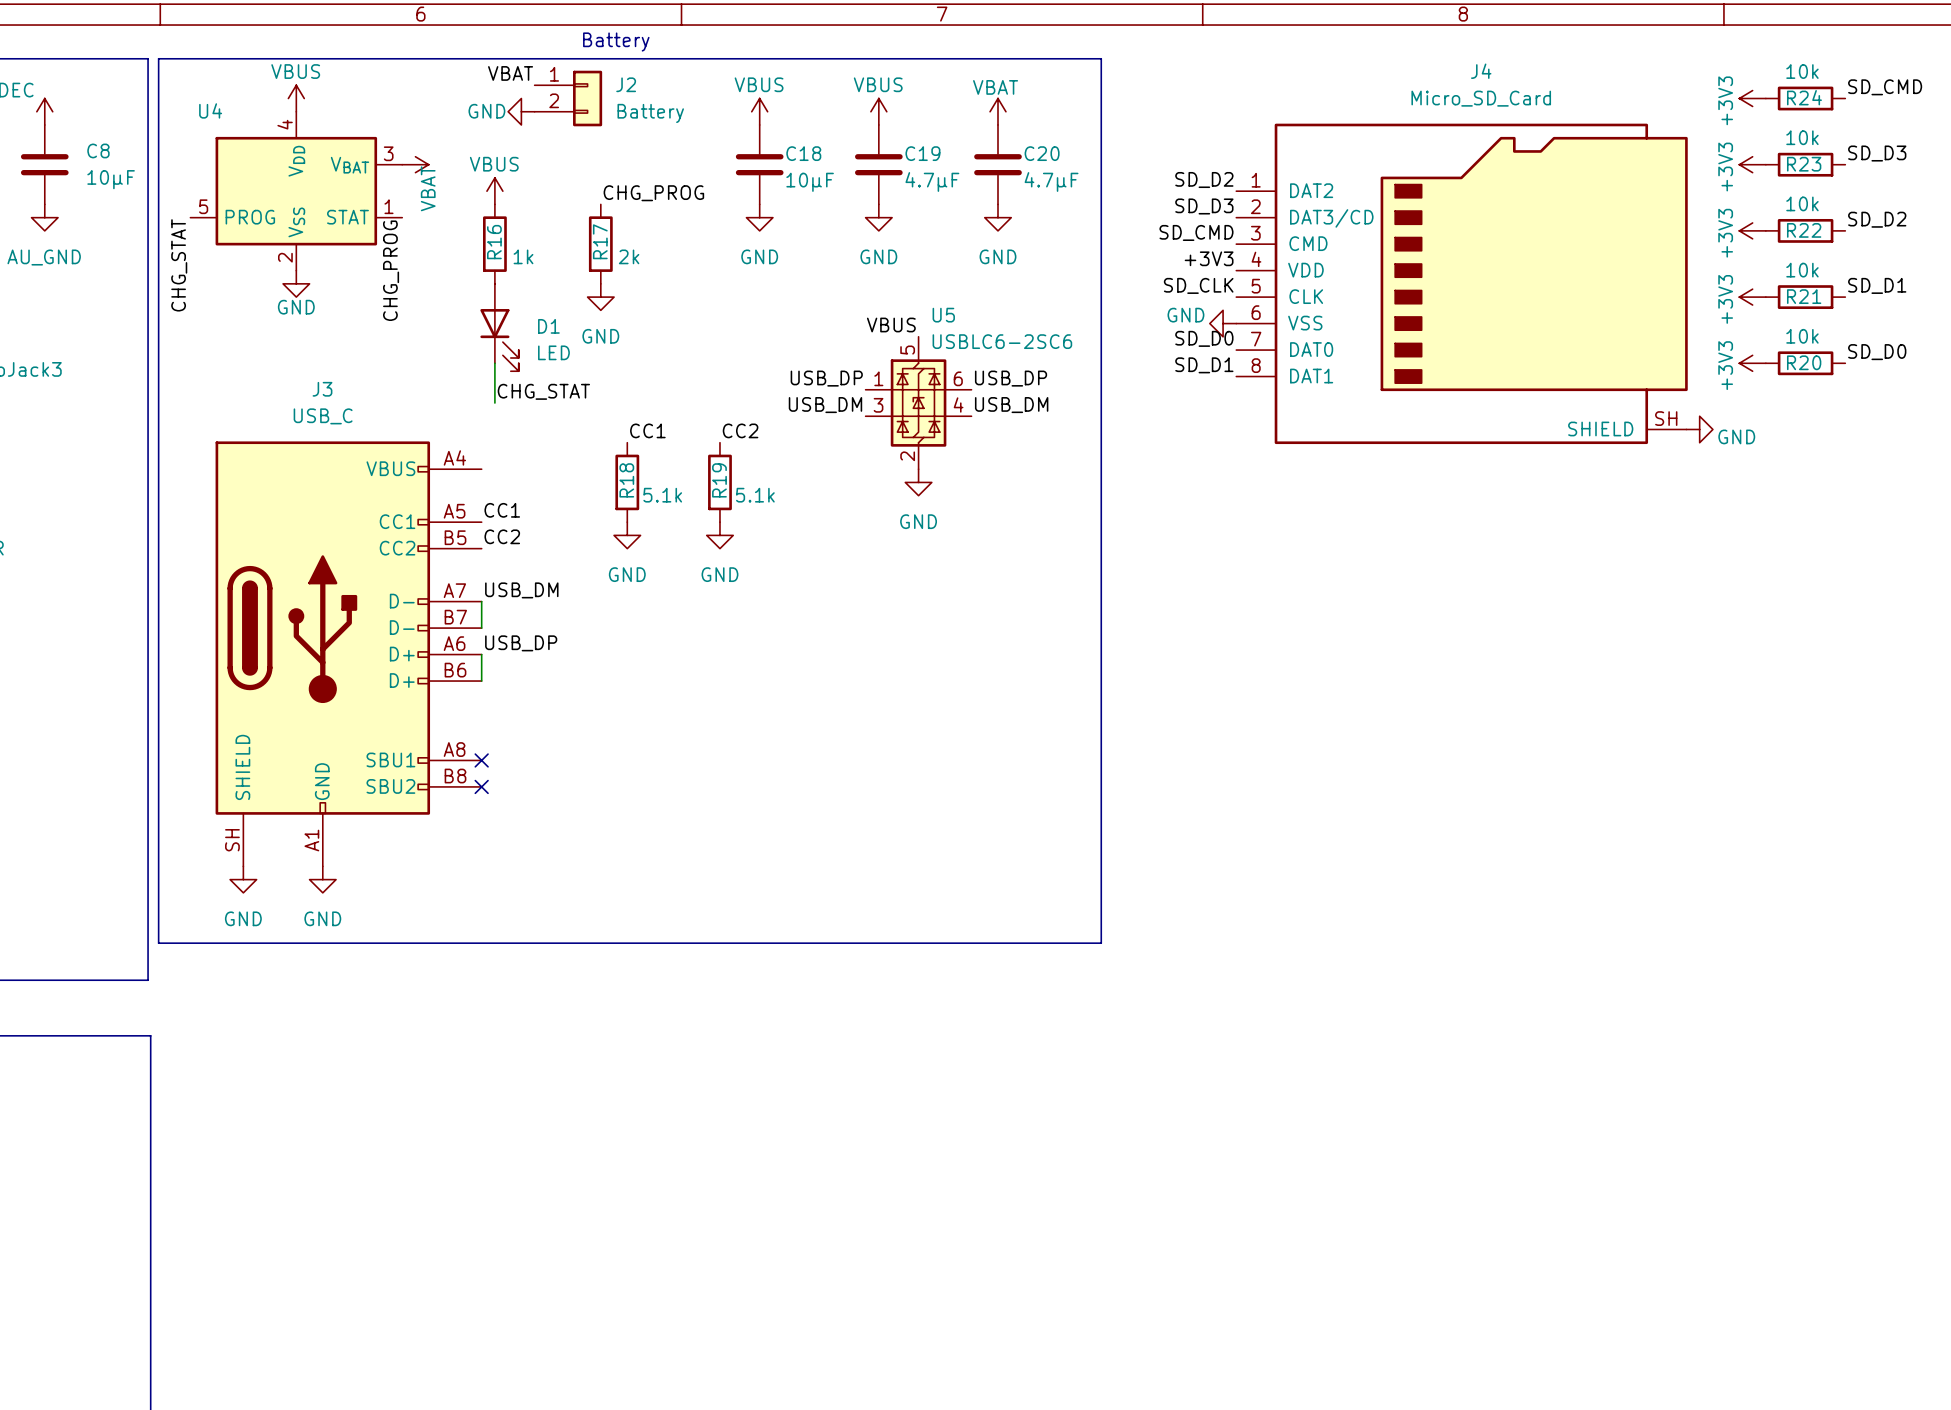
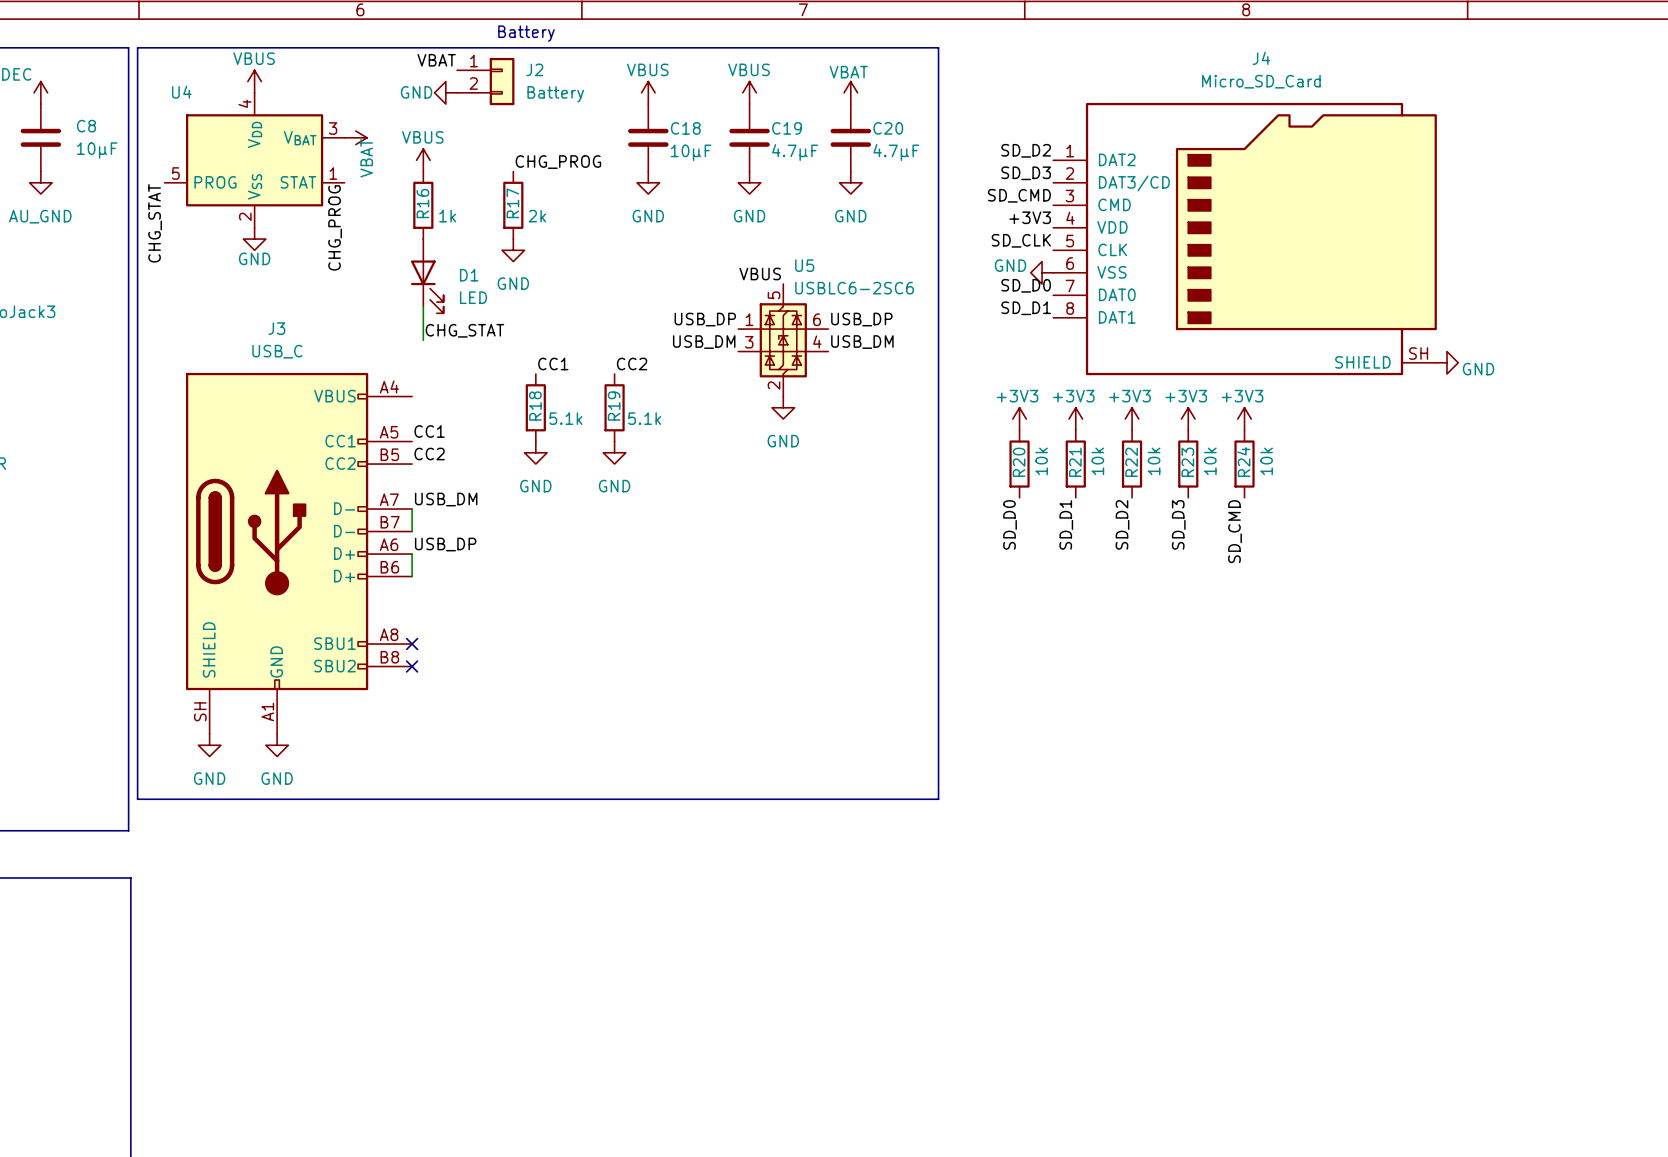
label: SD_CMD (1885, 87) -> none
power symbol: +3V3 (1752, 98) -> none
R24 rotation: 0° (1805, 98) -> 90° clockwise (1244, 464)
R24 position: (1805, 98) -> (1244, 464)
label: SD_D3 (1877, 153) -> none
power symbol: +3V3 (1752, 164) -> none
R23 rotation: 0° (1805, 164) -> 90° clockwise (1188, 464)
R23 position: (1805, 164) -> (1188, 464)
label: SD_D2 (1877, 219) -> none
power symbol: +3V3 (1752, 230) -> none
R22 rotation: 0° (1805, 230) -> 90° clockwise (1132, 464)
R22 position: (1805, 230) -> (1132, 464)
label: SD_D1 (1877, 285) -> none
power symbol: +3V3 (1752, 297) -> none
R21 rotation: 0° (1805, 297) -> 90° clockwise (1075, 464)
R21 position: (1805, 297) -> (1075, 464)
label: SD_D0 (1877, 352) -> none
power symbol: +3V3 (1752, 363) -> none
R20 rotation: 0° (1805, 363) -> 90° clockwise (1019, 464)
R20 position: (1805, 363) -> (1019, 464)
power symbol: none -> +3V3 (1019, 419)
power symbol: none -> +3V3 (1075, 419)
power symbol: none -> +3V3 (1132, 419)
power symbol: none -> +3V3 (1188, 419)
power symbol: none -> +3V3 (1244, 419)
label: none -> SD_D0 (1010, 524)
label: none -> SD_D1 (1066, 524)
label: none -> SD_D2 (1122, 524)
label: none -> SD_D3 (1178, 524)
label: none -> SD_CMD (1235, 531)

